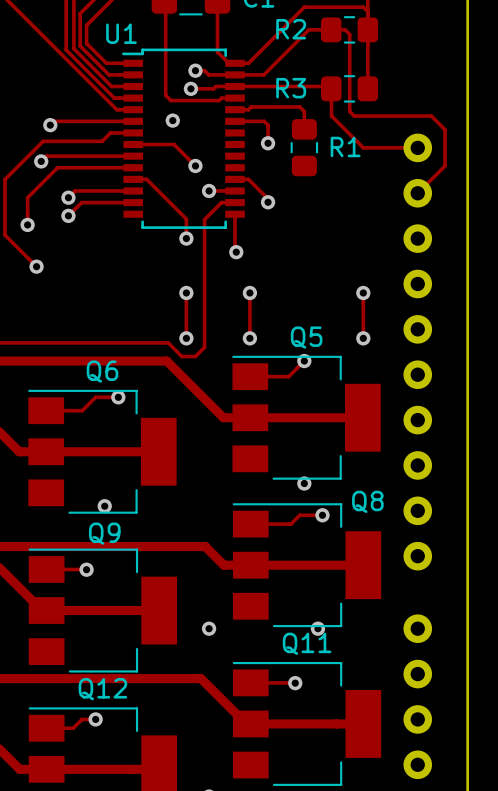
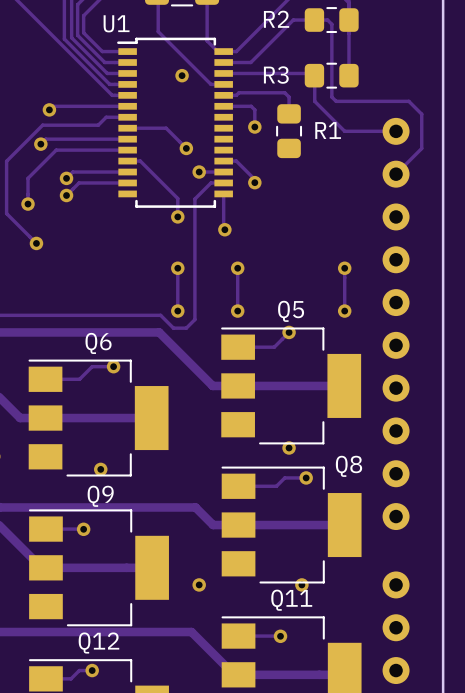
track: (165, 42) (165, 95) (170, 100) (219, 100) (221, 98) -> (158, 31) (210, 84)
track: (195, 70) (204, 70) (208, 74) (235, 74) -> none
via: (195, 70) -> none
track: (235, 86) (190, 88) -> none
via: (172, 120) -> none

